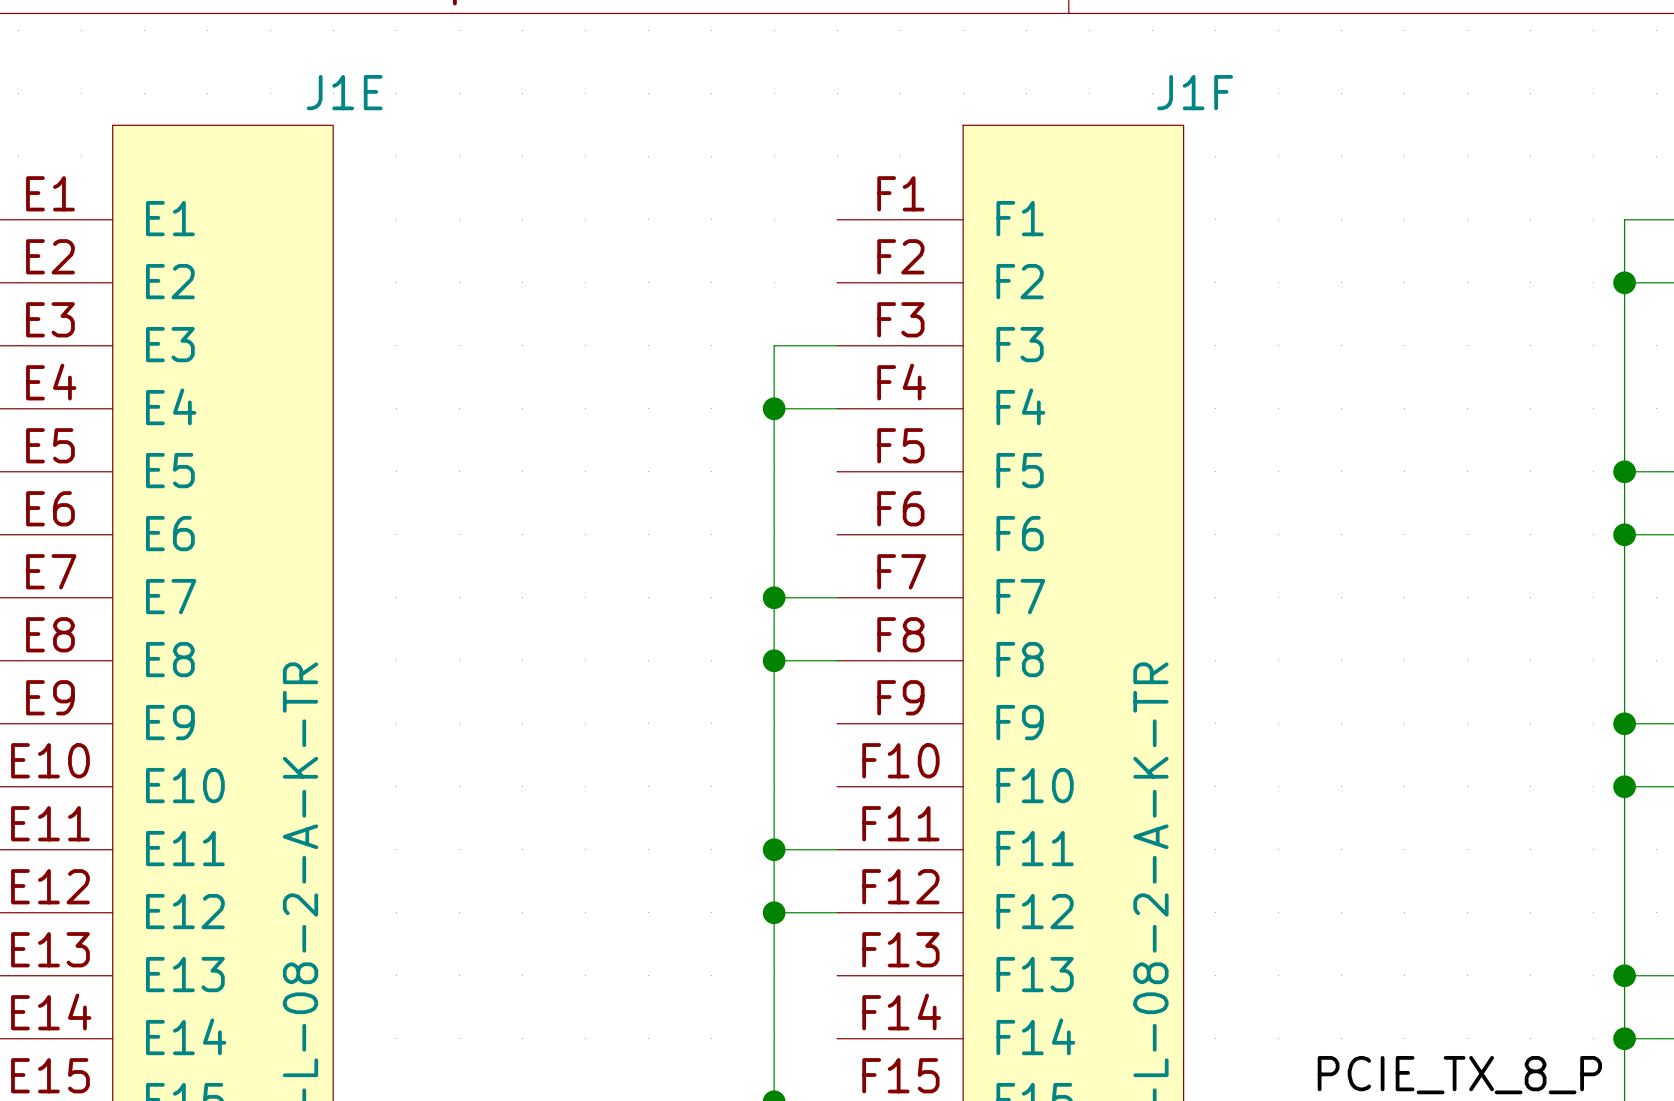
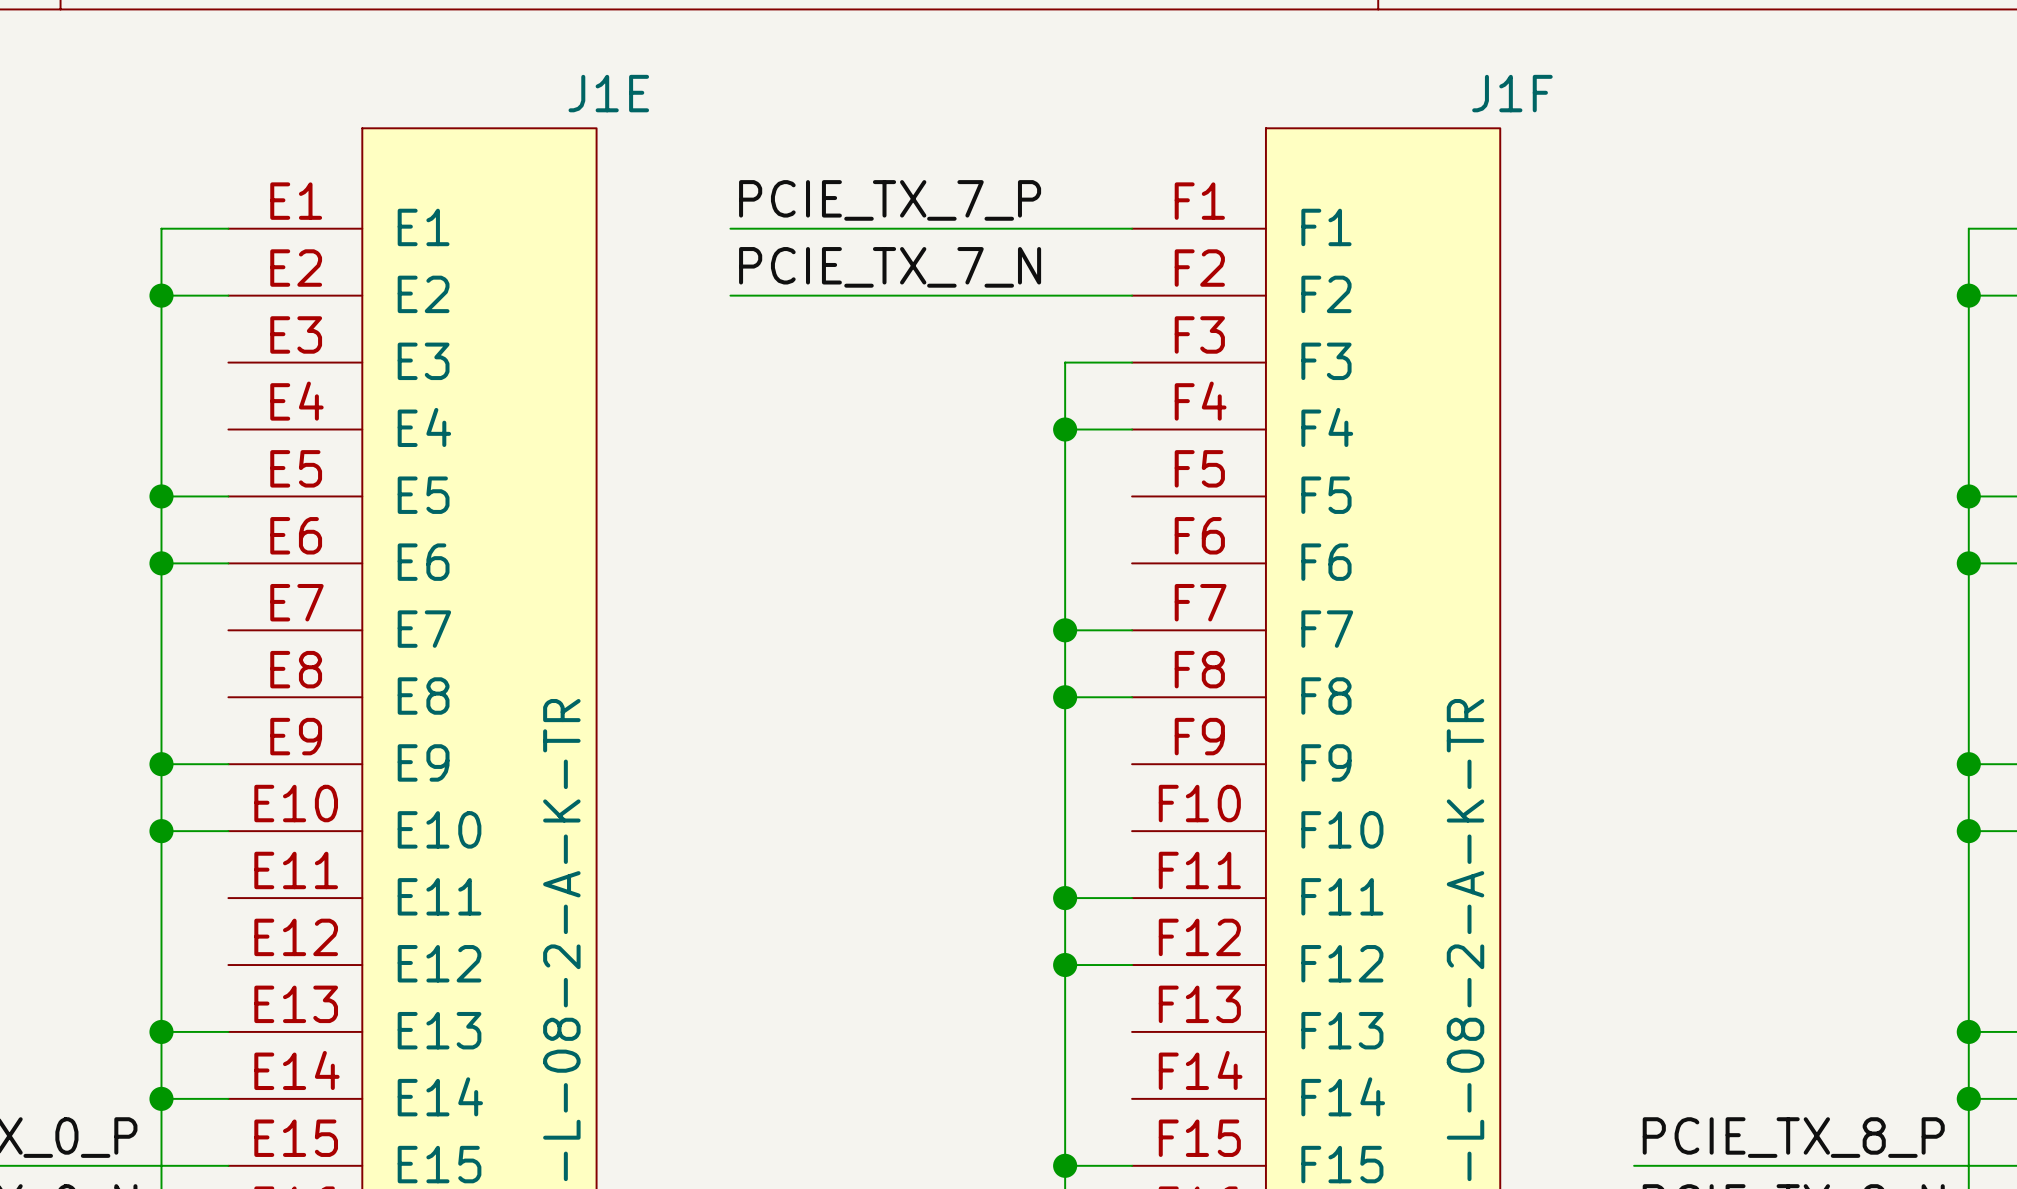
label: none -> PCIE_TX_7_P (890, 200)
wire: none -> (730, 228) (1132, 228)
label: none -> PCIE_TX_7_N (890, 267)
wire: none -> (730, 295) (1132, 295)

